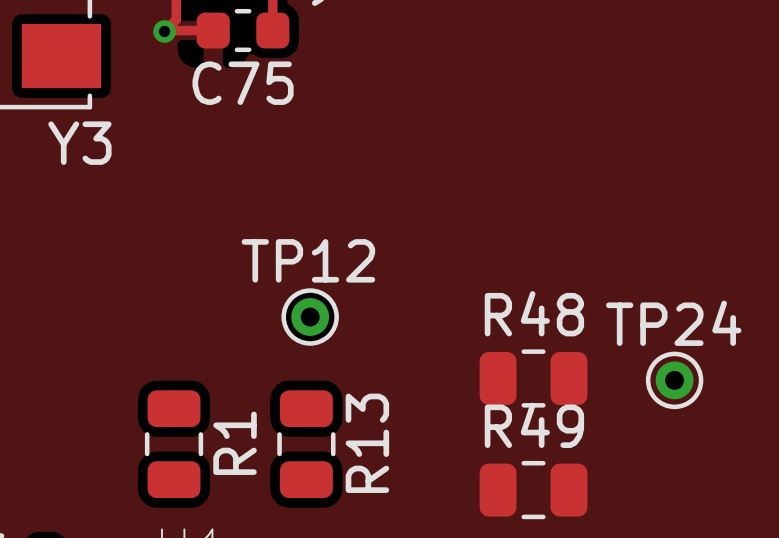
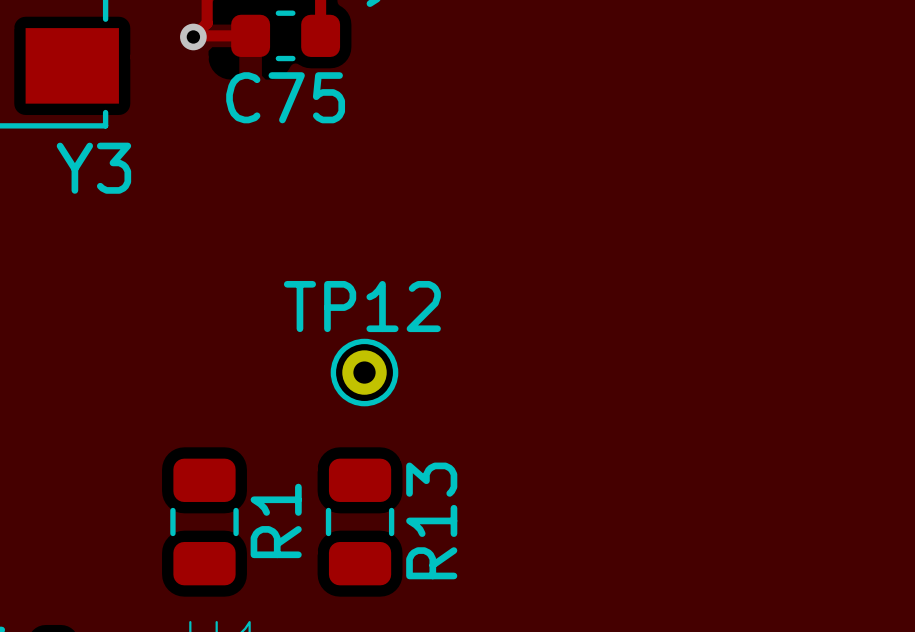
R48: (533, 378) -> none
TP24: (674, 380) -> none
R49: (533, 490) -> none

